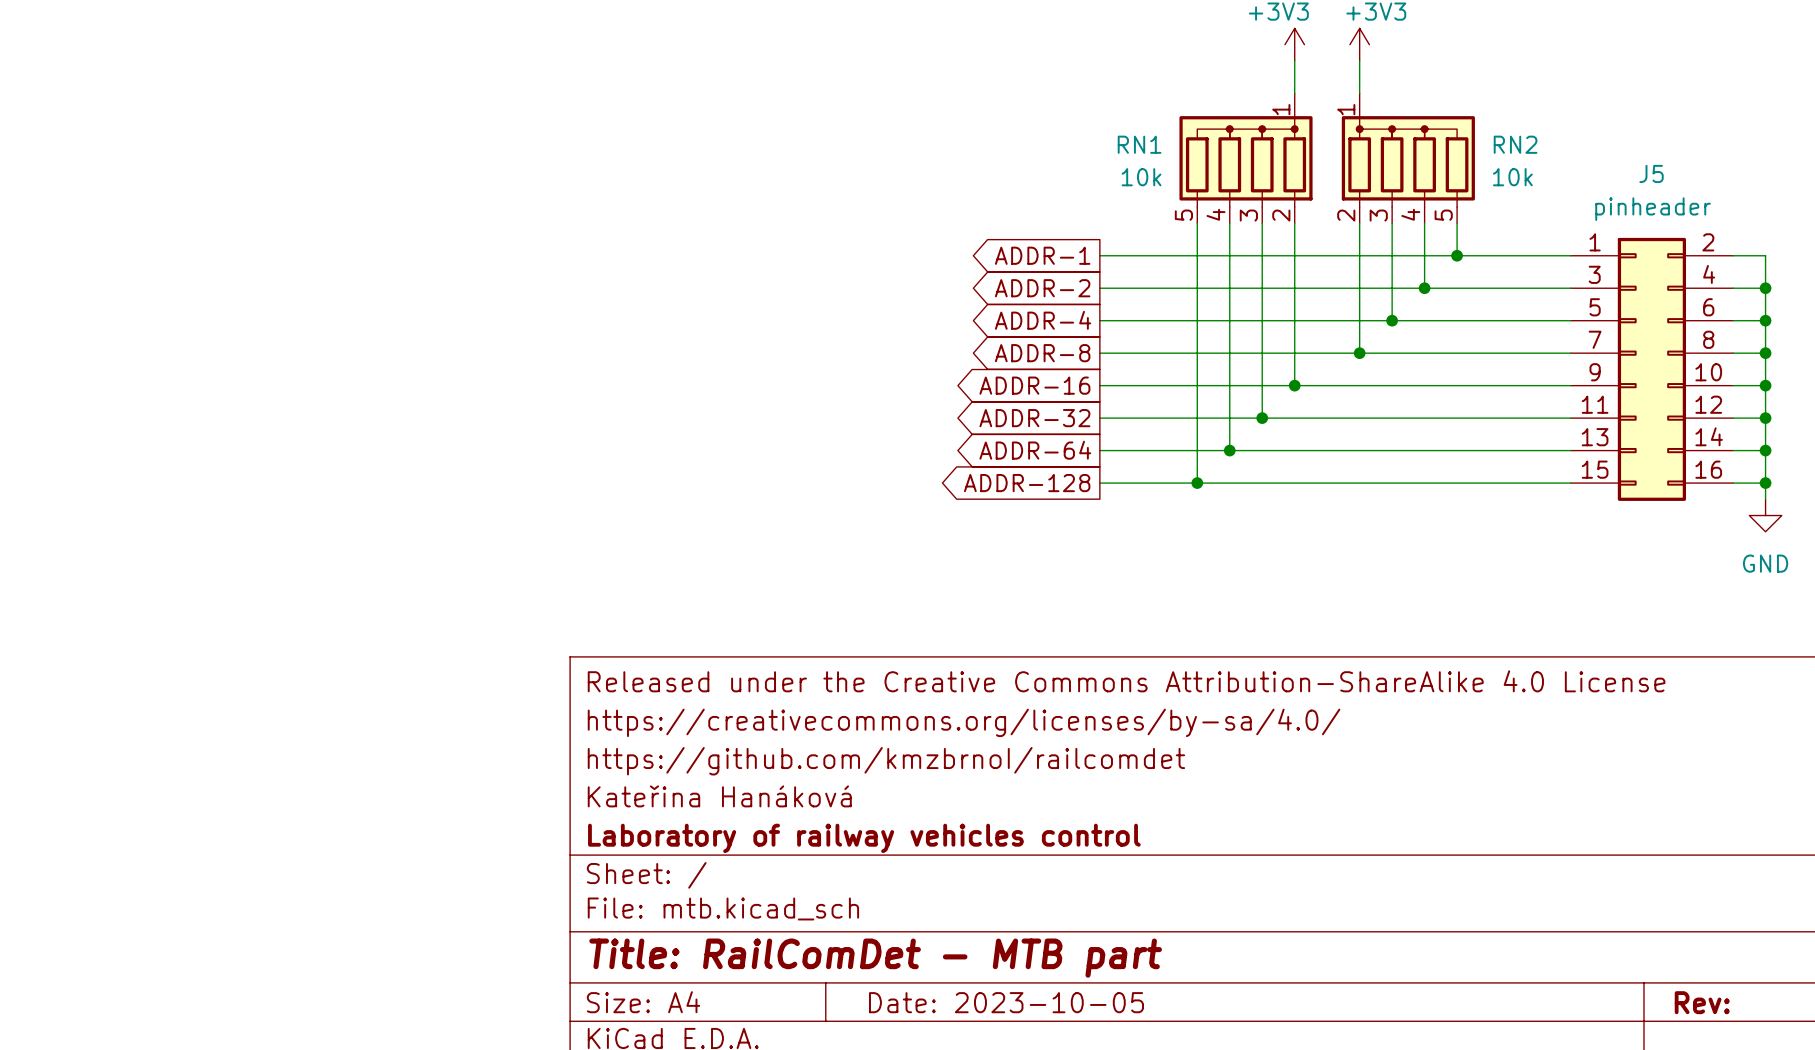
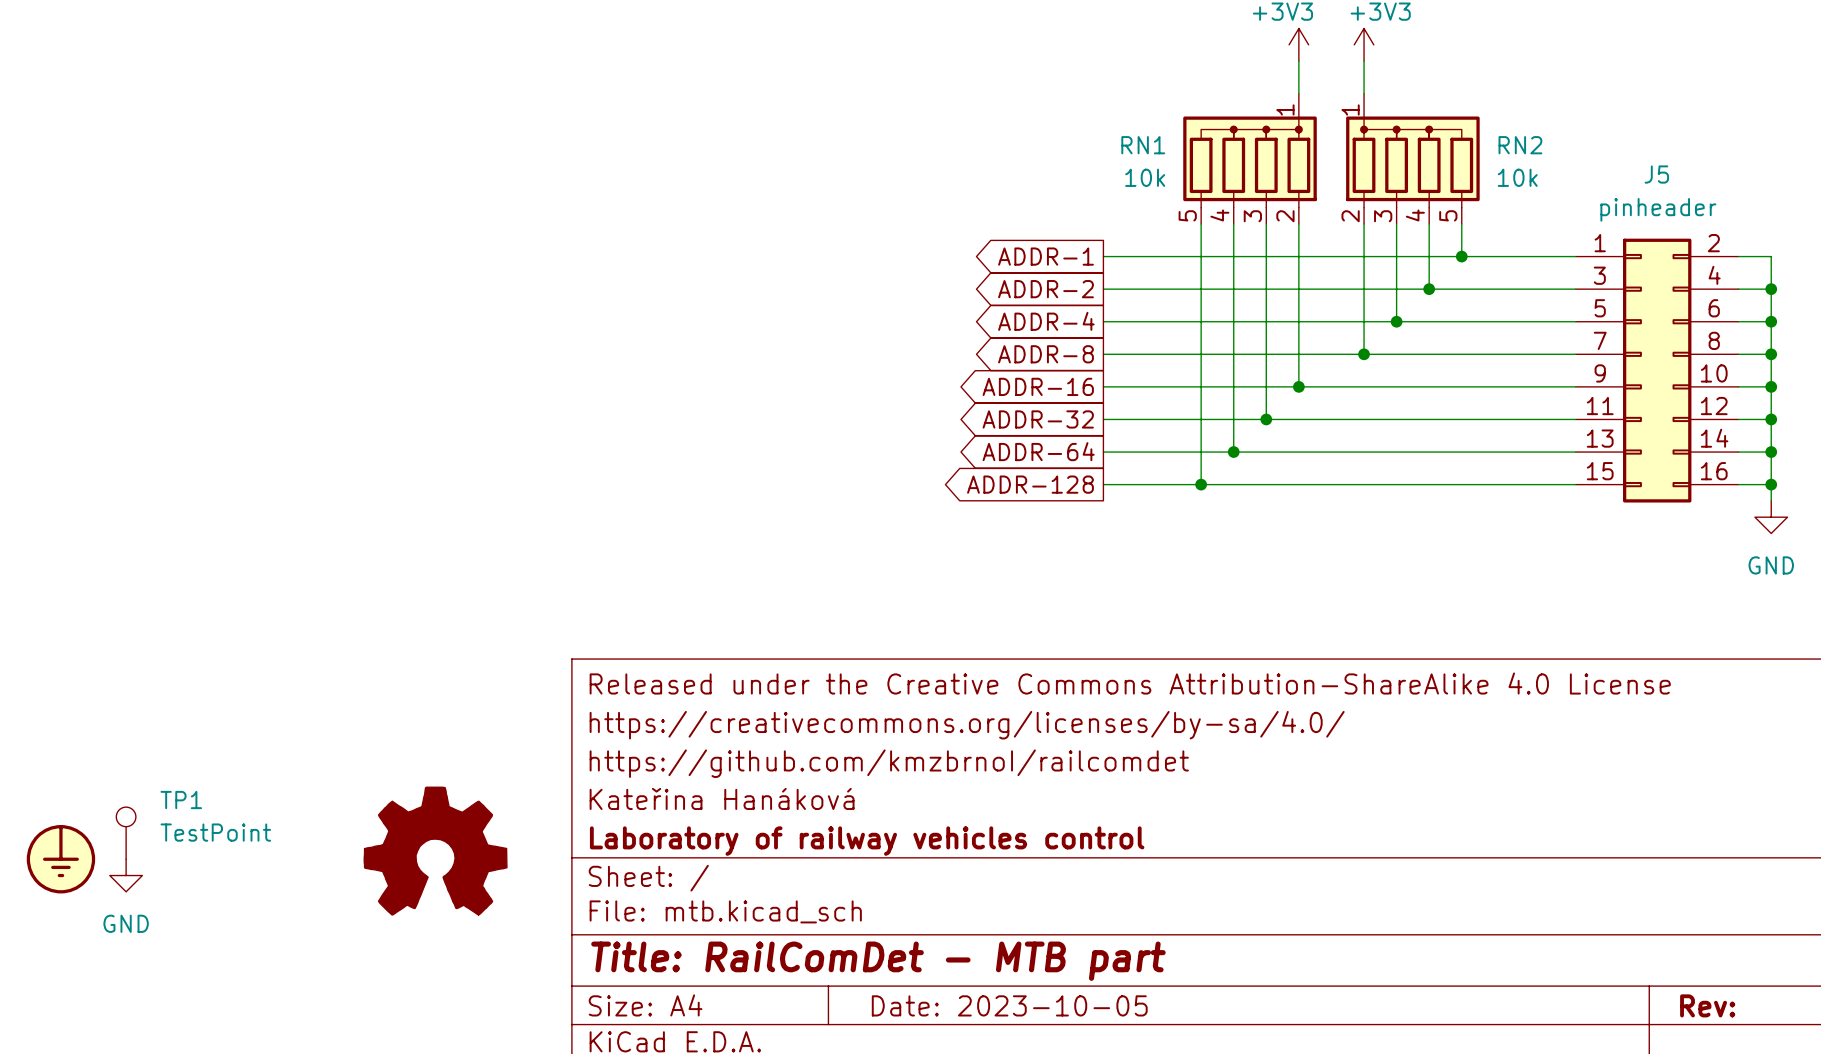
TP1: none -> TestPoint (126, 833)
power symbol: none -> (435, 851)
power symbol: none -> (60, 859)
power symbol: none -> GND (126, 875)

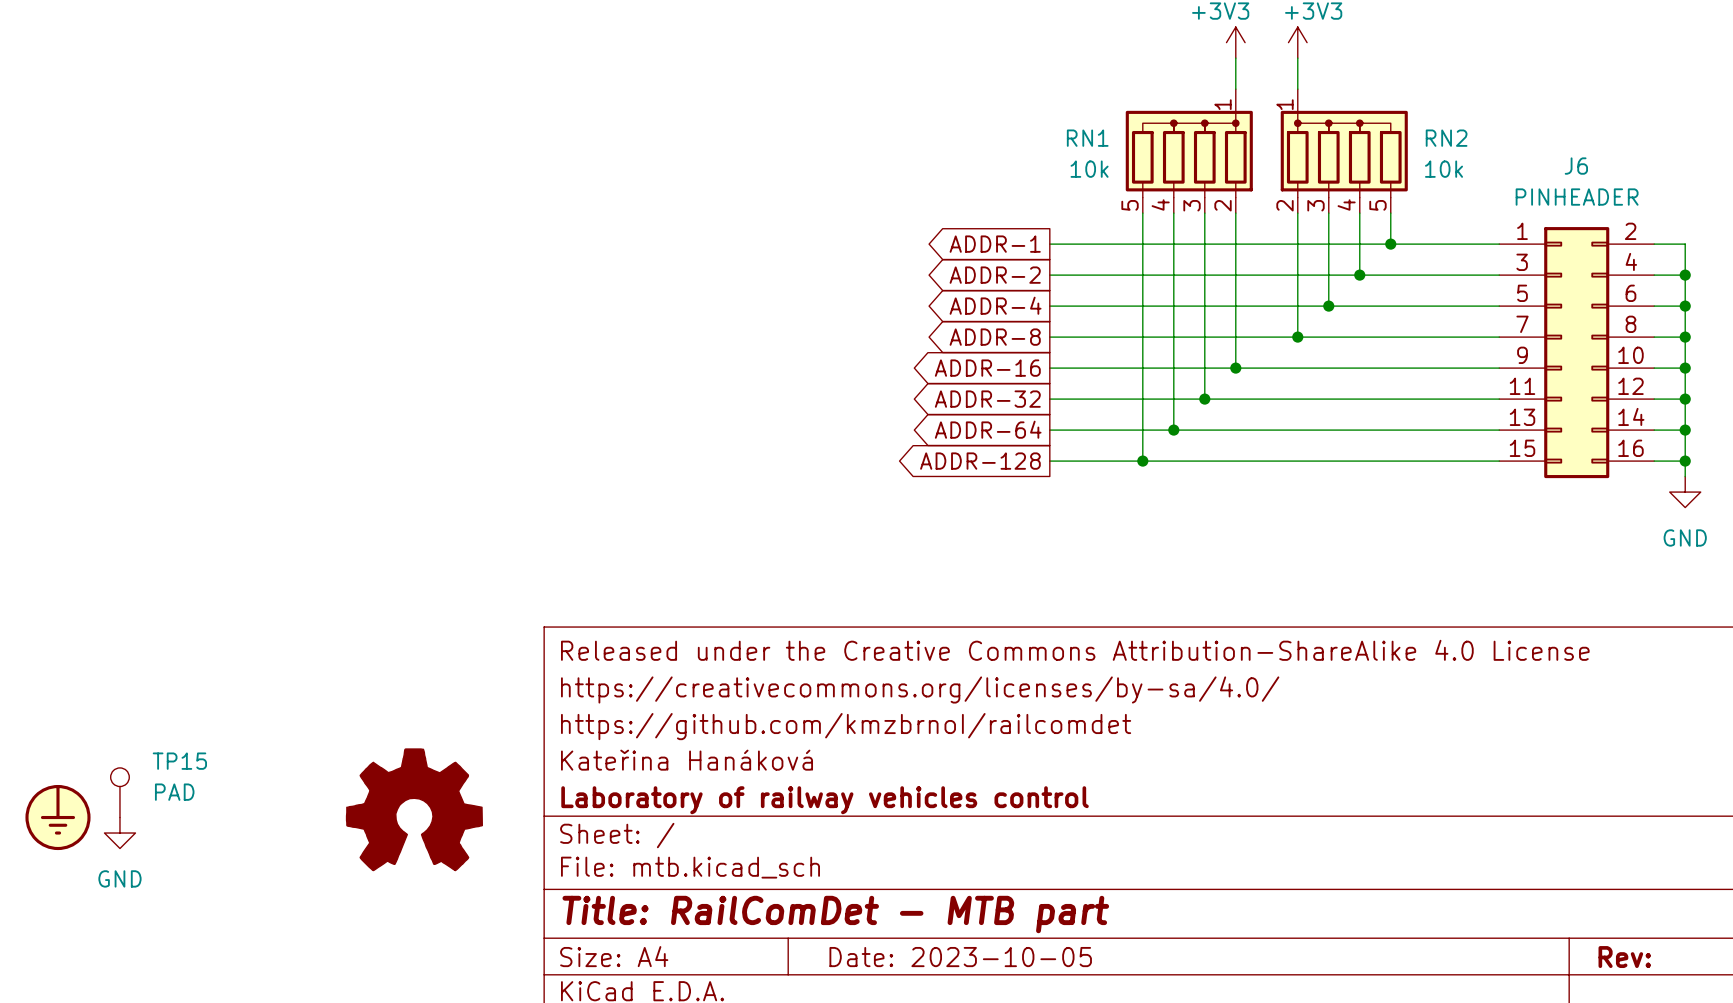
J5 name: J5 (1656, 174) -> J6 (1576, 166)
J5 value: pinheader (1658, 209) -> PINHEADER (1577, 197)
TP1 name: TP1 (181, 800) -> TP15 (179, 761)
TP1 value: TestPoint (215, 832) -> PAD (174, 792)

